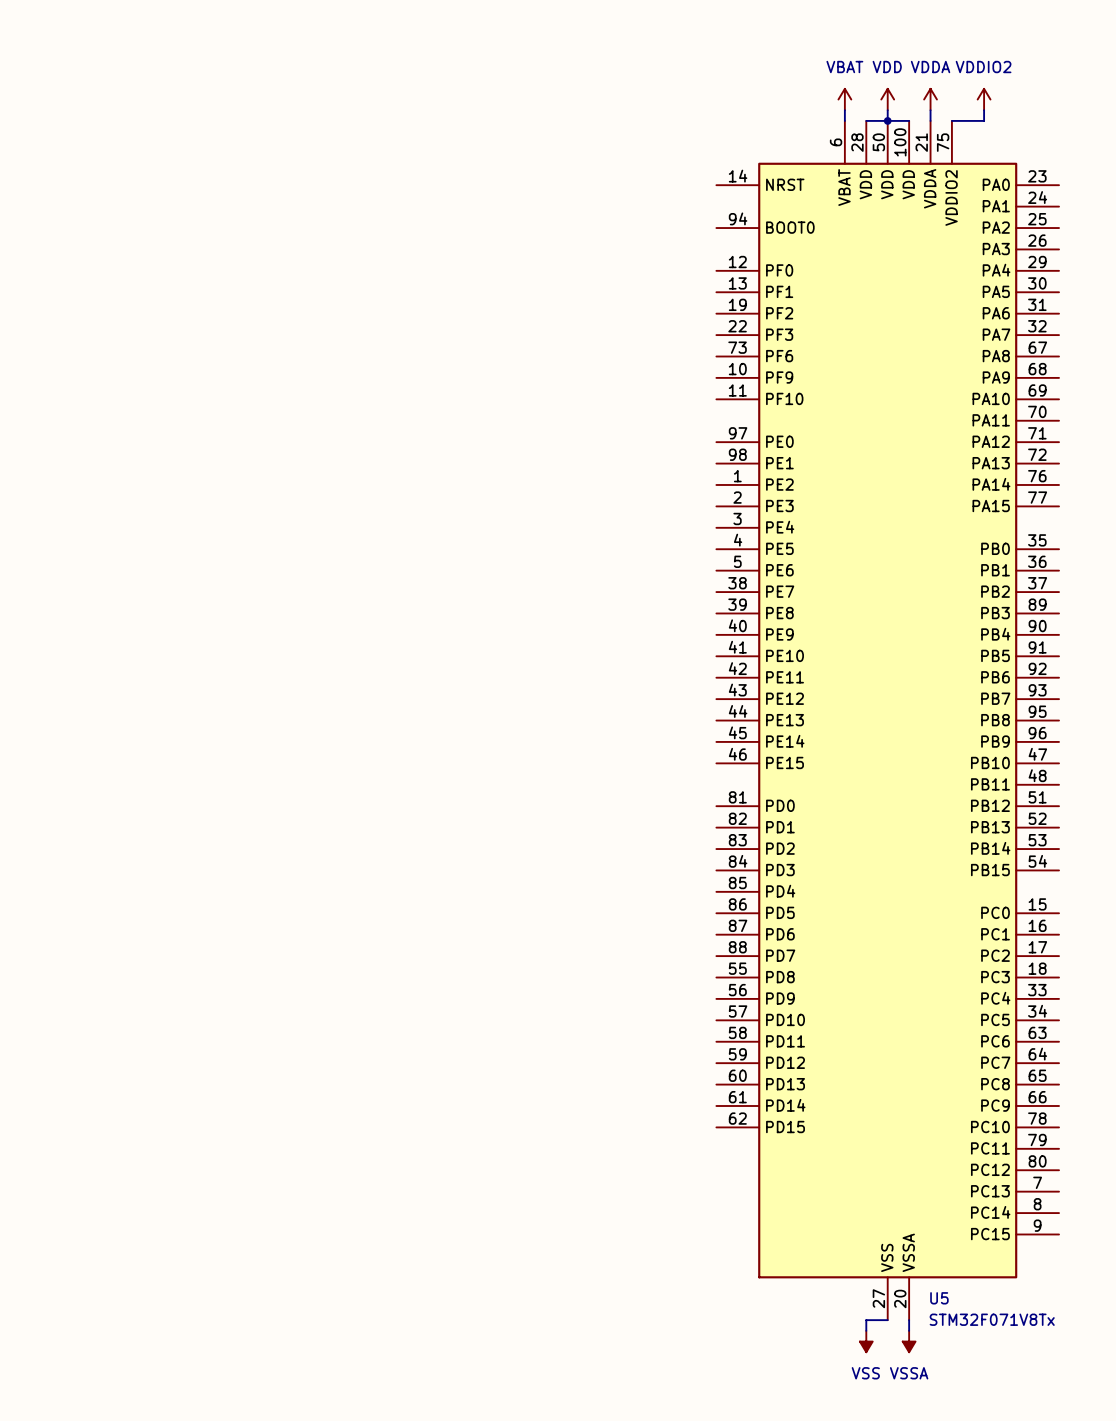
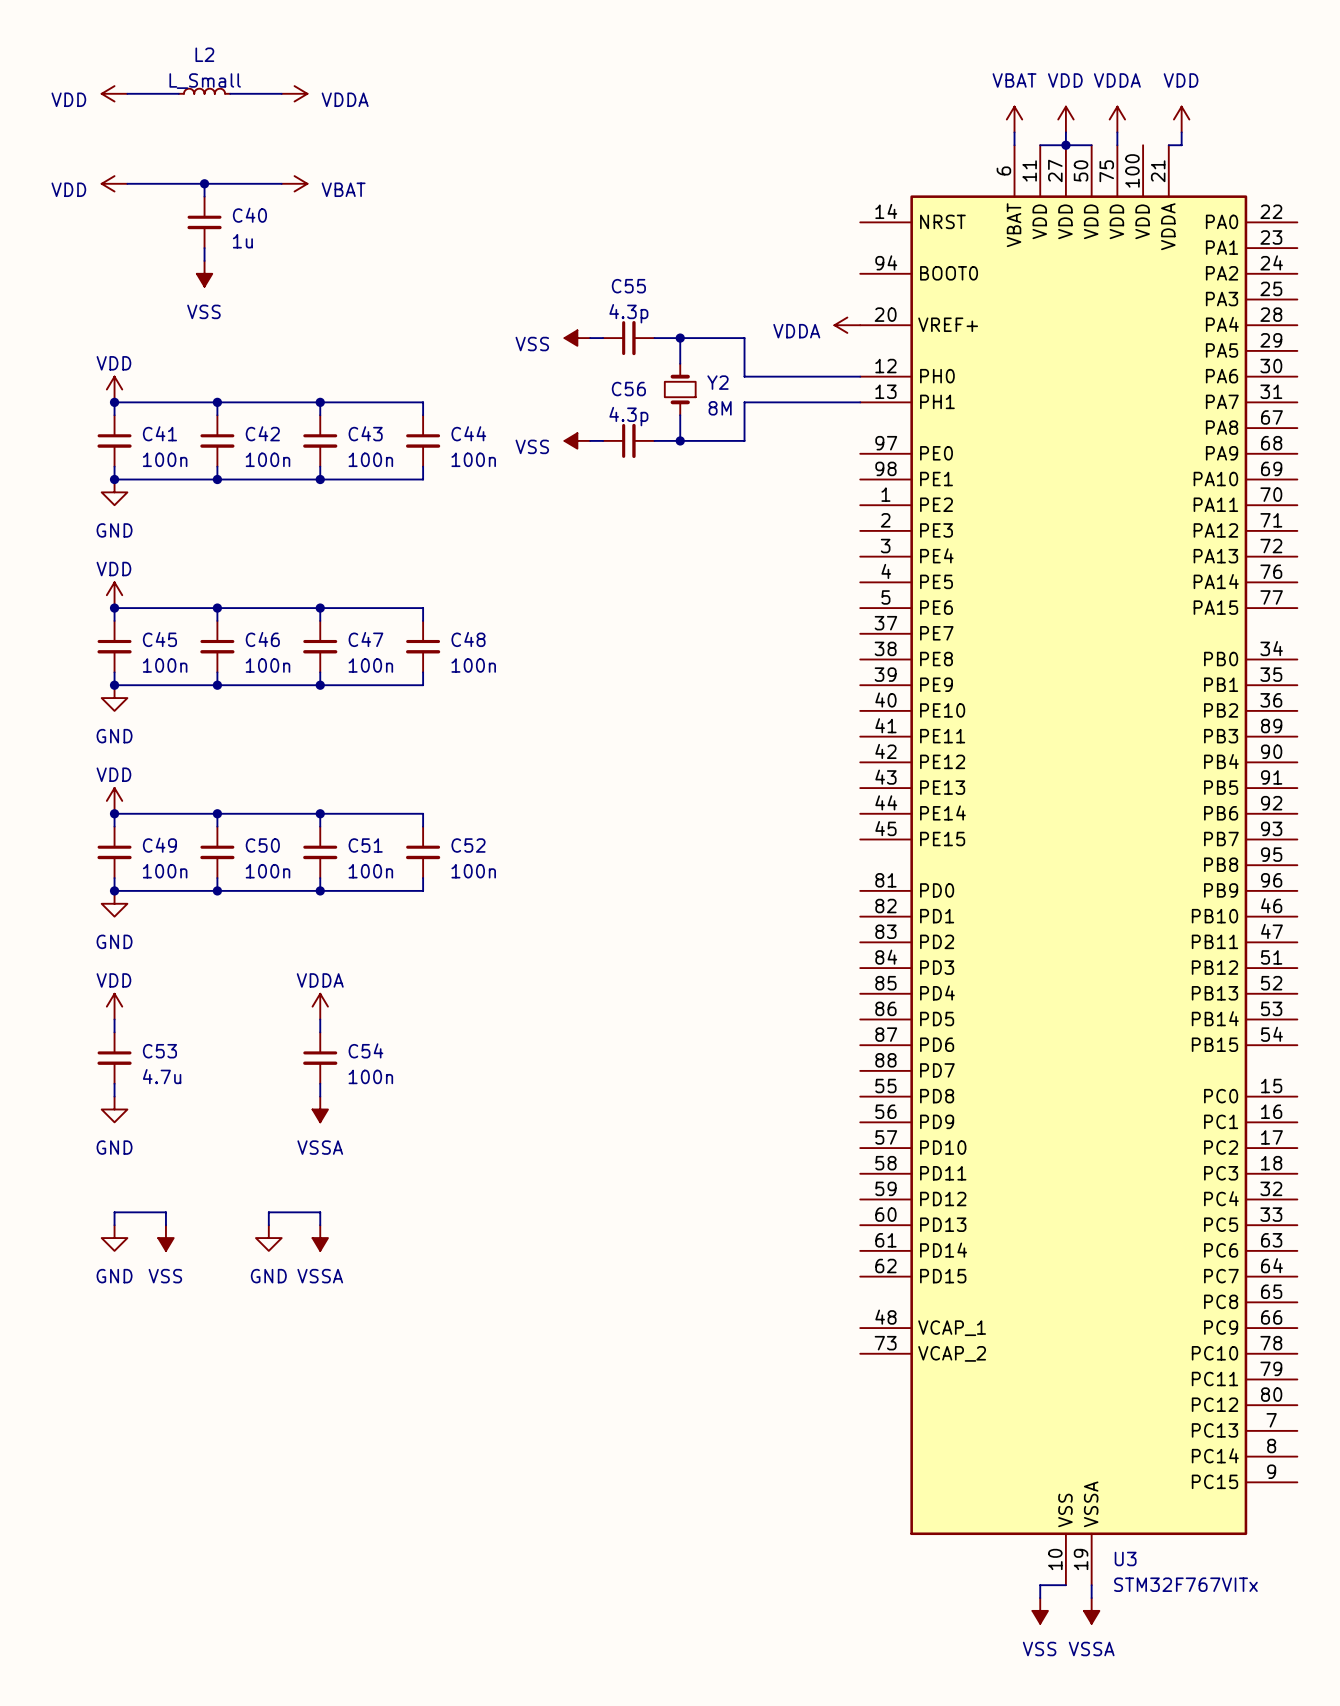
L2: none -> L_Small (204, 91)
power symbol: none -> VDD (114, 93)
wire: none -> (127, 93) (178, 93)
wire: none -> (230, 93) (281, 93)
power symbol: none -> VDDA (294, 93)
power symbol: VDDIO2 (984, 99) -> VDD (1181, 119)
wire: (951, 120) (973, 120) -> none
power symbol: none -> VDD (114, 183)
wire: none -> (127, 183) (281, 183)
wire: none -> (204, 183) (204, 196)
junction: none -> (204, 183)
power symbol: none -> VBAT (294, 183)
C40: none -> 1u (204, 222)
wire: none -> (204, 248) (204, 260)
power symbol: none -> VSS (204, 273)
power symbol: none -> VDDA (847, 325)
power symbol: none -> VSS (577, 338)
wire: none -> (590, 338) (603, 338)
C55: none -> 4.3p (628, 338)
wire: none -> (654, 338) (744, 338) (744, 376) (860, 376)
wire: none -> (680, 338) (680, 363)
junction: none -> (680, 338)
power symbol: none -> VDD (114, 389)
Y2: none -> 8M (680, 389)
junction: none -> (114, 402)
wire: none -> (217, 402) (217, 415)
junction: none -> (217, 402)
wire: none -> (320, 402) (320, 415)
junction: none -> (320, 402)
wire: none -> (860, 402) (744, 402) (744, 440) (654, 440)
wire: none -> (114, 415) (114, 402) (423, 402) (423, 415)
wire: none -> (680, 415) (680, 440)
C41: none -> 100n (114, 440)
C42: none -> 100n (217, 440)
C43: none -> 100n (320, 440)
C44: none -> 100n (423, 440)
power symbol: none -> VSS (577, 440)
wire: none -> (590, 440) (603, 440)
C56: none -> 4.3p (628, 440)
junction: none -> (680, 440)
wire: none -> (114, 466) (114, 479) (423, 479) (423, 466)
wire: none -> (217, 466) (217, 479)
wire: none -> (320, 466) (320, 479)
junction: none -> (114, 479)
junction: none -> (217, 479)
junction: none -> (320, 479)
power symbol: none -> GND (114, 492)
power symbol: none -> VDD (114, 595)
junction: none -> (114, 608)
wire: none -> (217, 608) (217, 620)
junction: none -> (217, 608)
wire: none -> (320, 608) (320, 620)
junction: none -> (320, 608)
wire: none -> (114, 620) (114, 608) (423, 608) (423, 620)
C45: none -> 100n (114, 646)
C46: none -> 100n (217, 646)
C47: none -> 100n (320, 646)
C48: none -> 100n (423, 646)
wire: none -> (114, 672) (114, 685) (423, 685) (423, 672)
wire: none -> (217, 672) (217, 685)
wire: none -> (320, 672) (320, 685)
junction: none -> (114, 685)
junction: none -> (217, 685)
junction: none -> (320, 685)
power symbol: none -> GND (114, 698)
power symbol: none -> VDD (114, 800)
junction: none -> (114, 813)
wire: none -> (217, 813) (217, 826)
junction: none -> (217, 813)
wire: none -> (320, 813) (320, 826)
junction: none -> (320, 813)
wire: none -> (114, 826) (114, 813) (423, 813) (423, 826)
C49: none -> 100n (114, 852)
C50: none -> 100n (217, 852)
C51: none -> 100n (320, 852)
C52: none -> 100n (423, 852)
U5: STM32F071V8Tx (887, 720) -> none
U3: none -> STM32F767VITx (1078, 865)
wire: none -> (114, 878) (114, 890) (423, 890) (423, 878)
wire: none -> (217, 878) (217, 890)
wire: none -> (320, 878) (320, 890)
junction: none -> (114, 890)
junction: none -> (217, 890)
junction: none -> (320, 890)
power symbol: none -> GND (114, 903)
power symbol: none -> VDD (114, 1006)
power symbol: none -> VDDA (320, 1006)
wire: none -> (114, 1019) (114, 1032)
wire: none -> (320, 1019) (320, 1032)
C53: none -> 4.7u (114, 1058)
C54: none -> 100n (320, 1058)
wire: none -> (114, 1083) (114, 1096)
wire: none -> (320, 1083) (320, 1096)
power symbol: none -> GND (114, 1109)
power symbol: none -> VSSA (320, 1109)
wire: none -> (114, 1225) (114, 1212) (165, 1212) (165, 1225)
wire: none -> (268, 1225) (268, 1212) (320, 1212) (320, 1225)
power symbol: none -> GND (114, 1238)
power symbol: none -> VSS (165, 1238)
power symbol: none -> GND (268, 1238)
power symbol: none -> VSSA (320, 1238)

